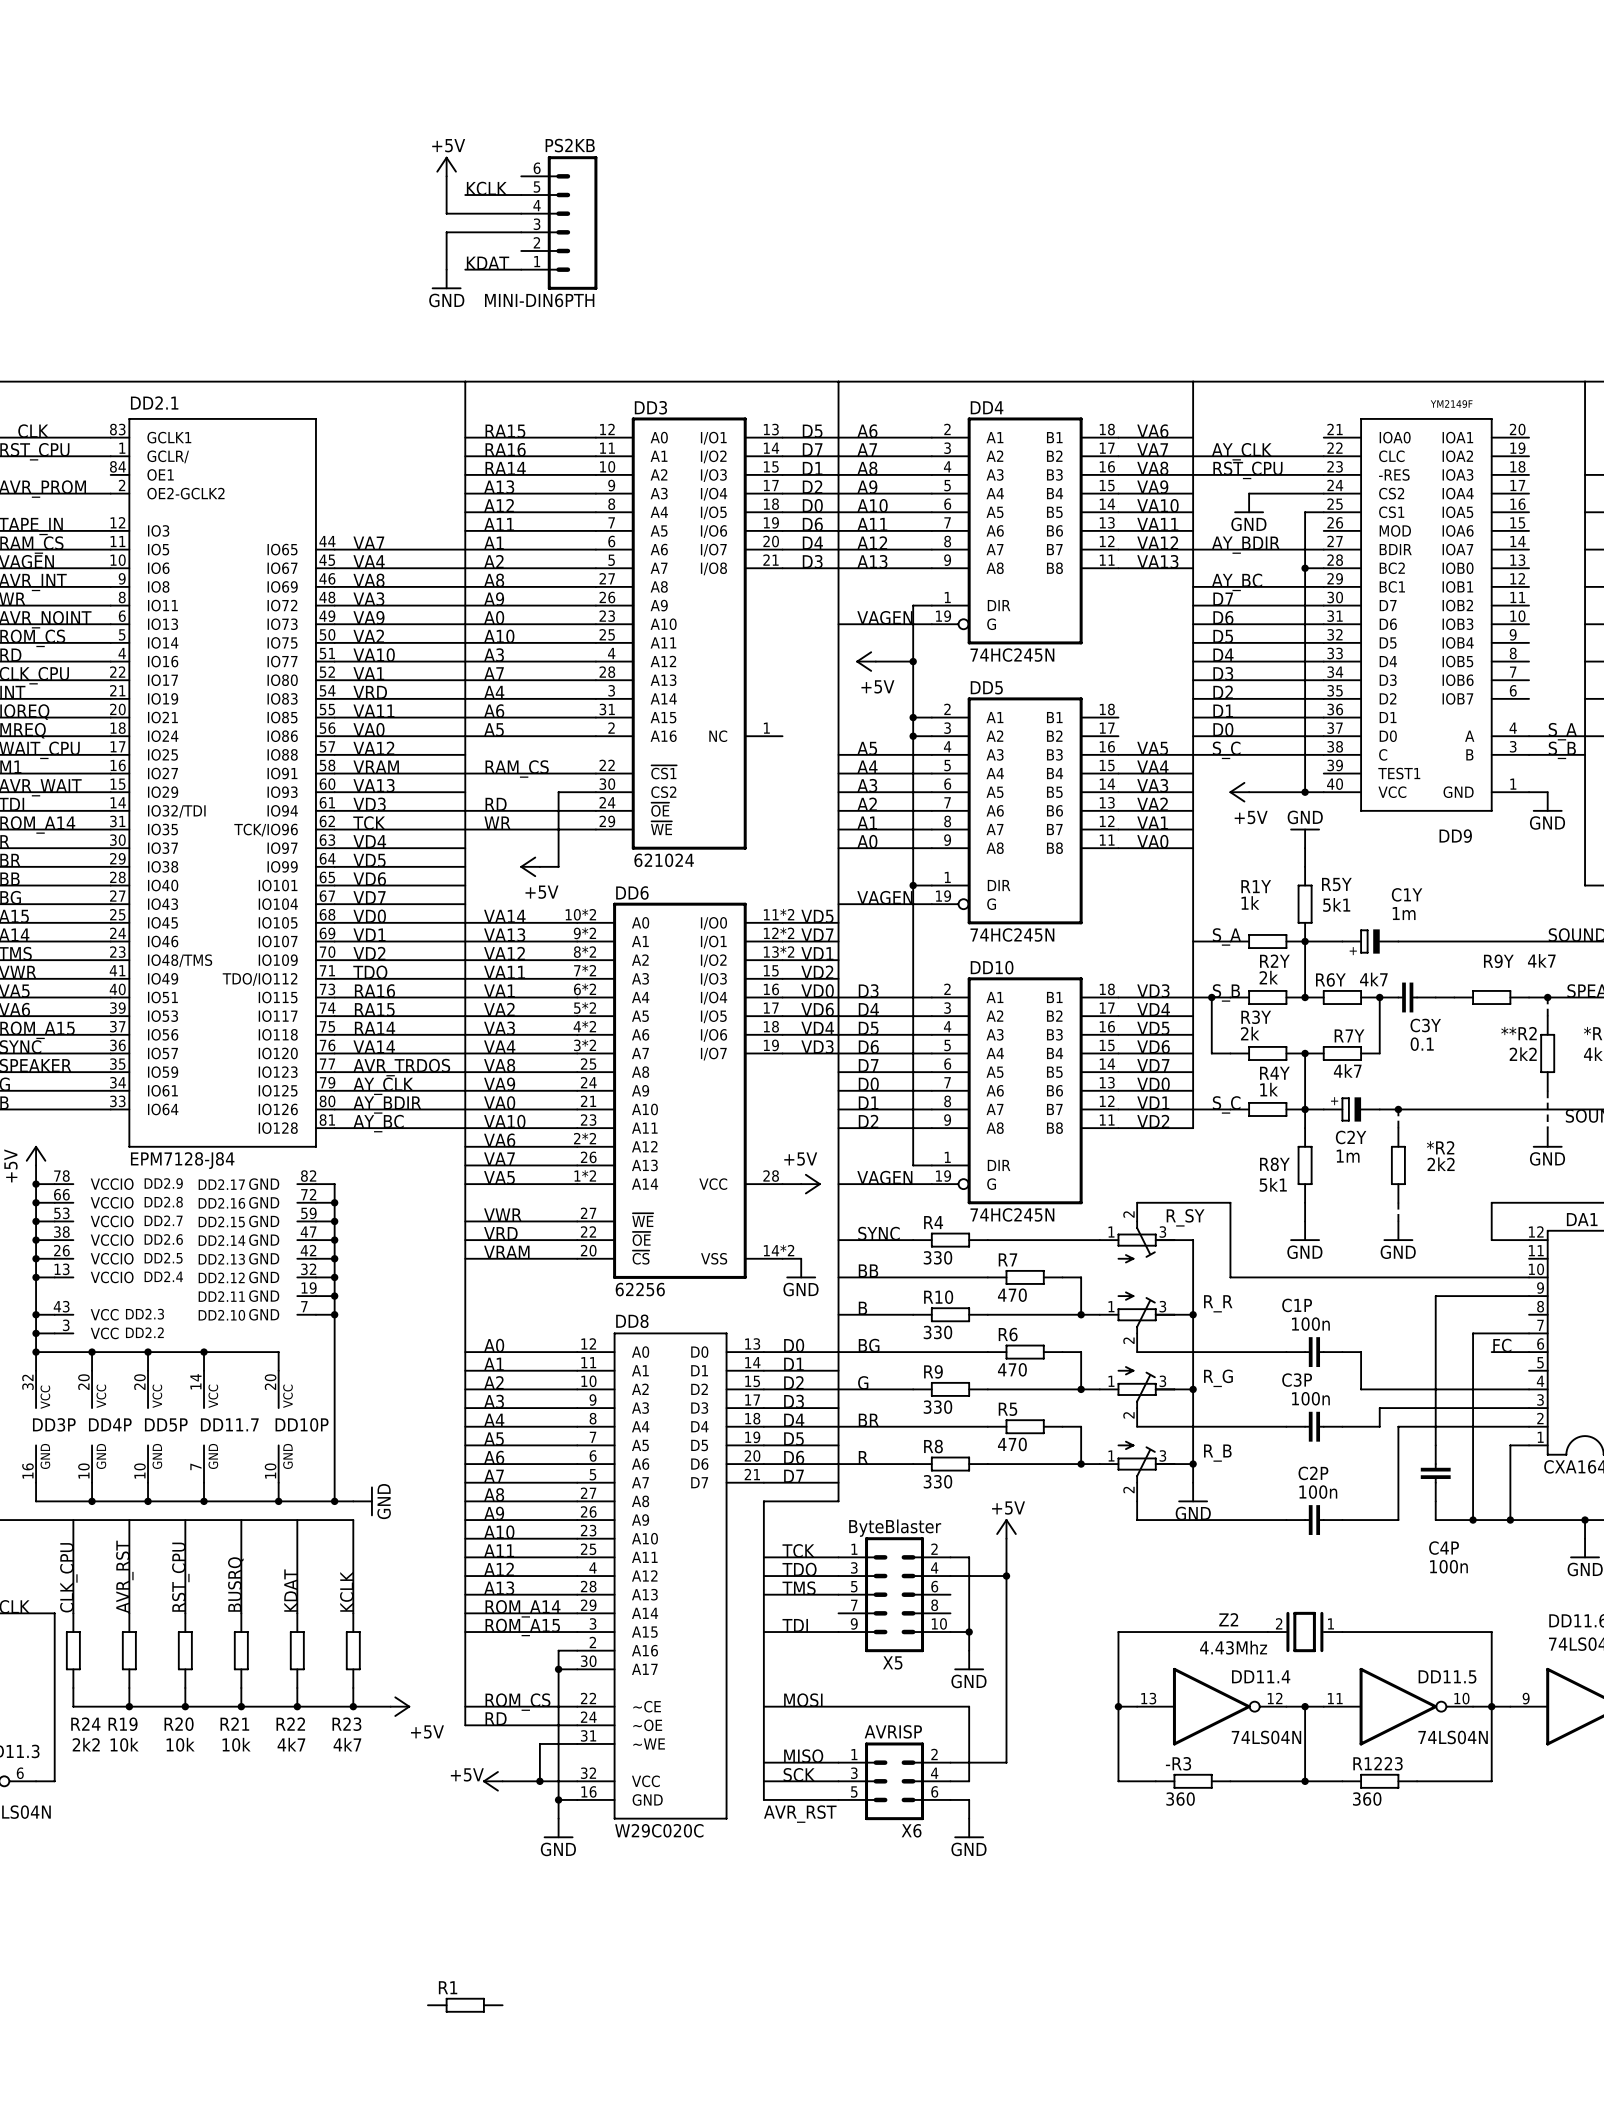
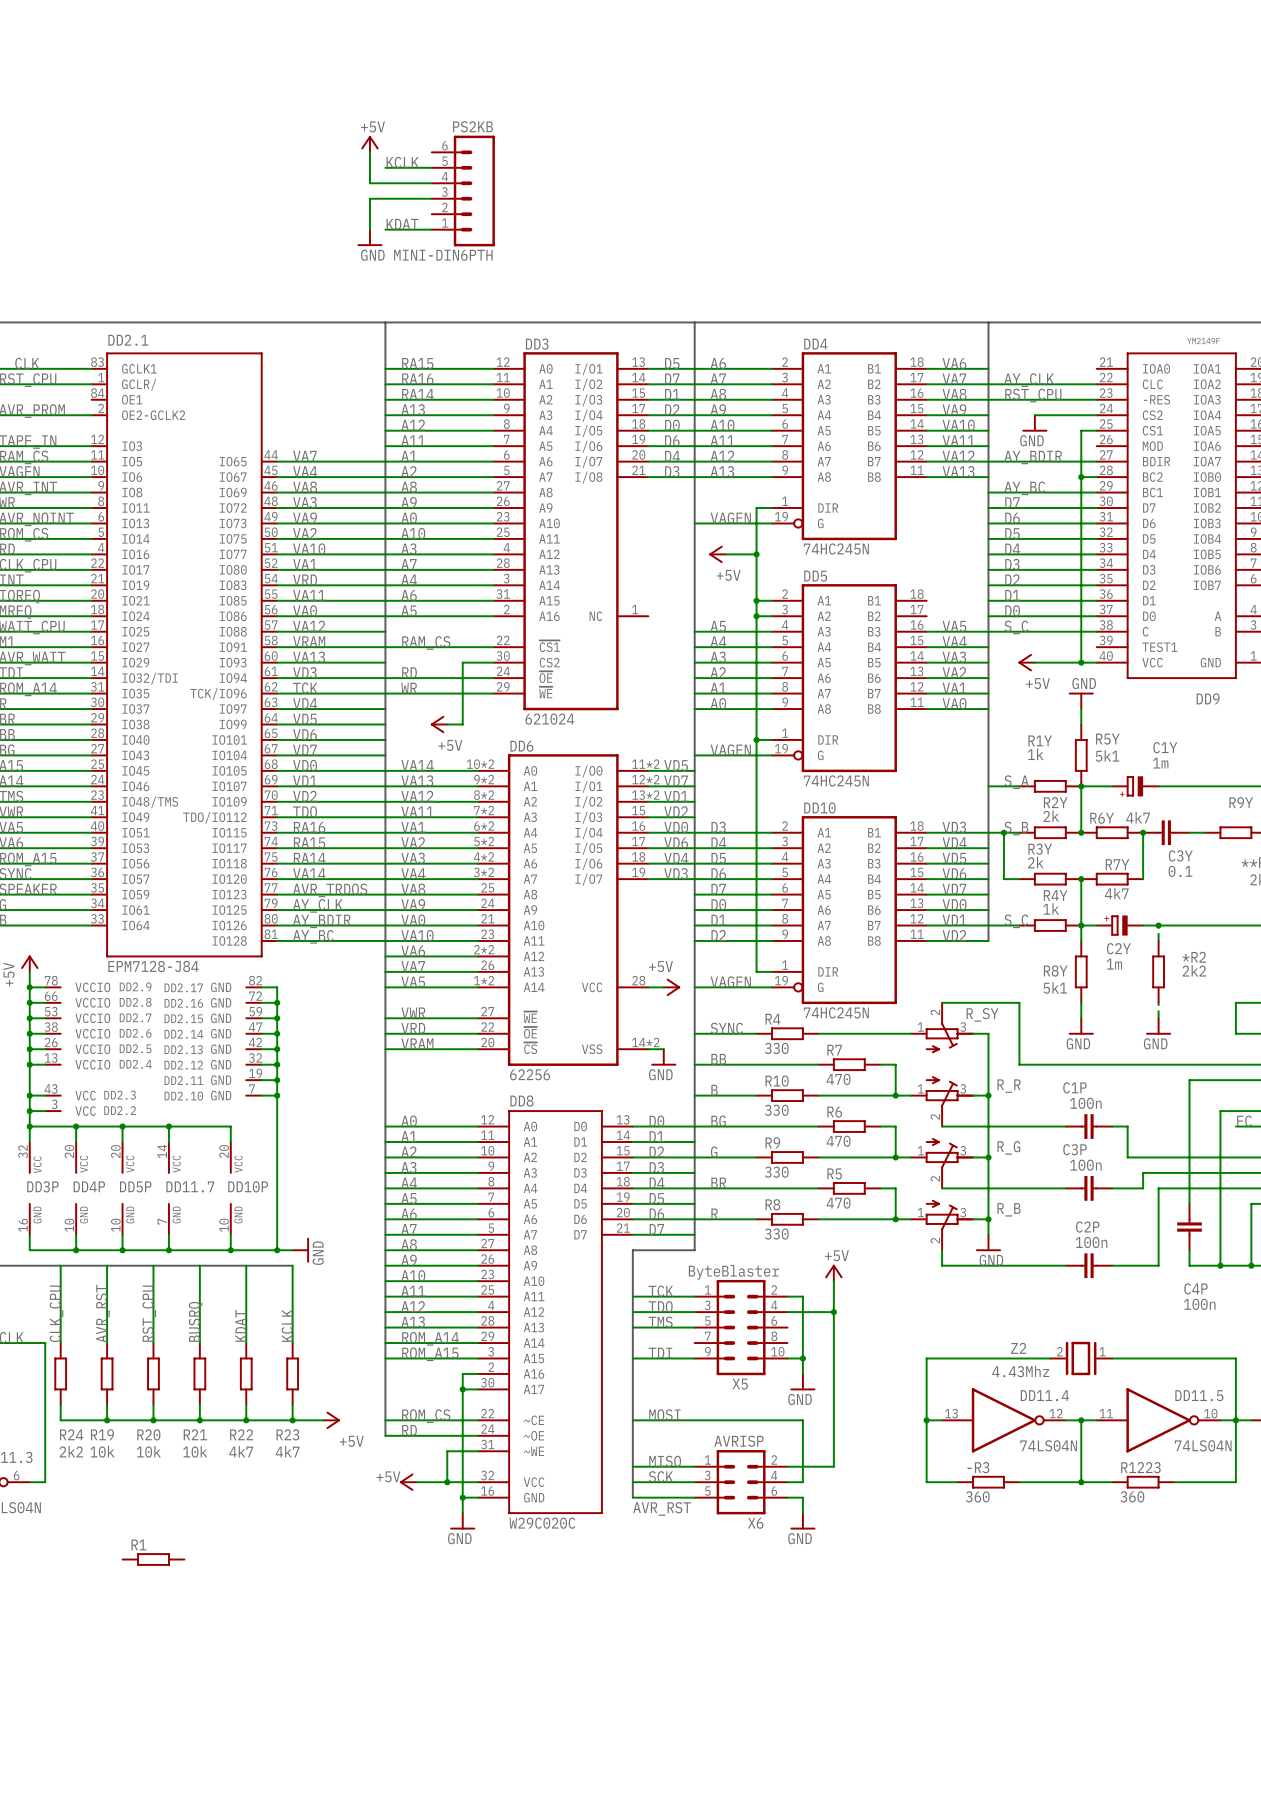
R1 position: (465, 2005) -> (153, 1559)

